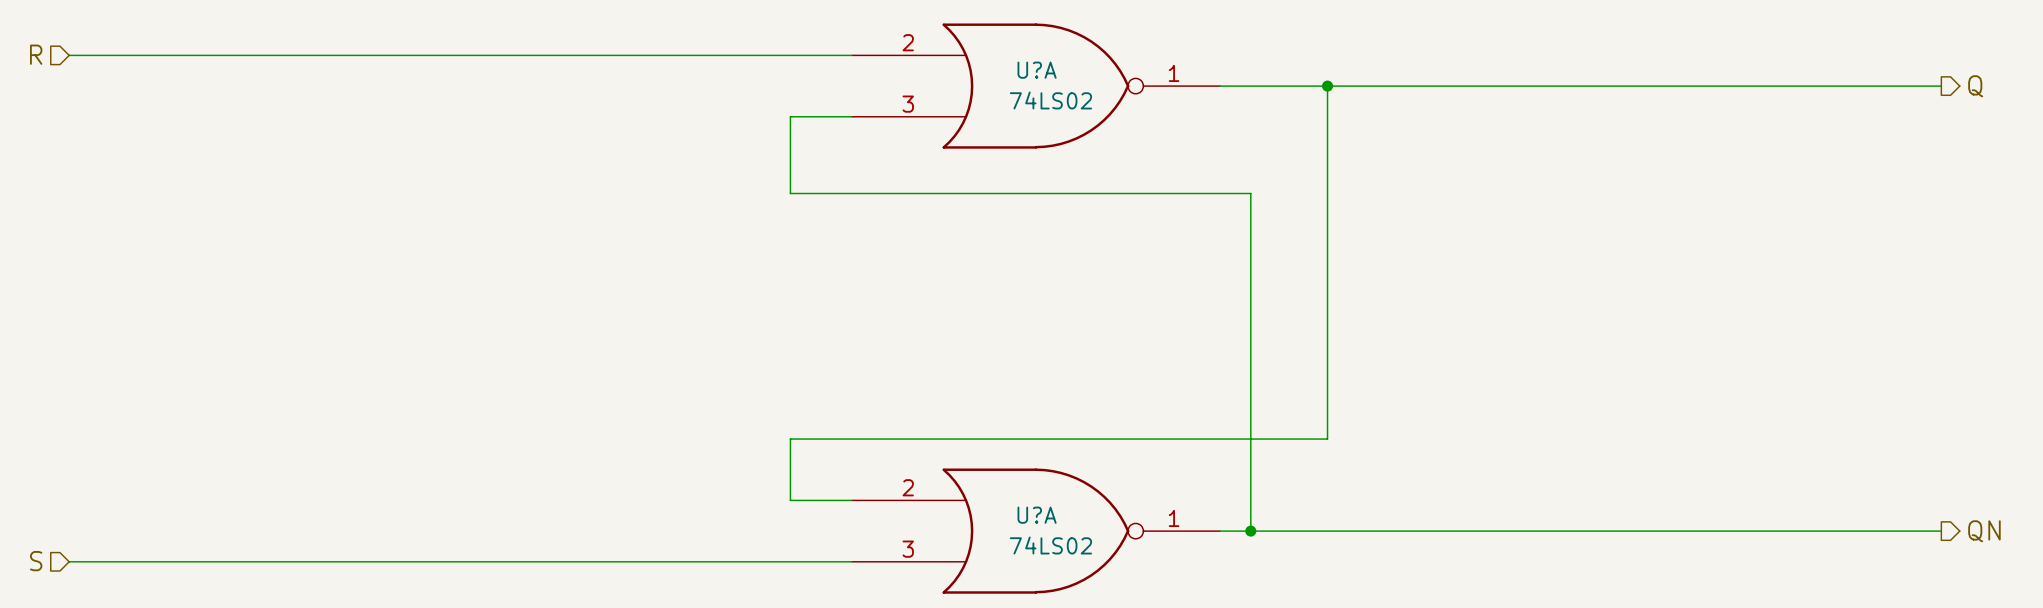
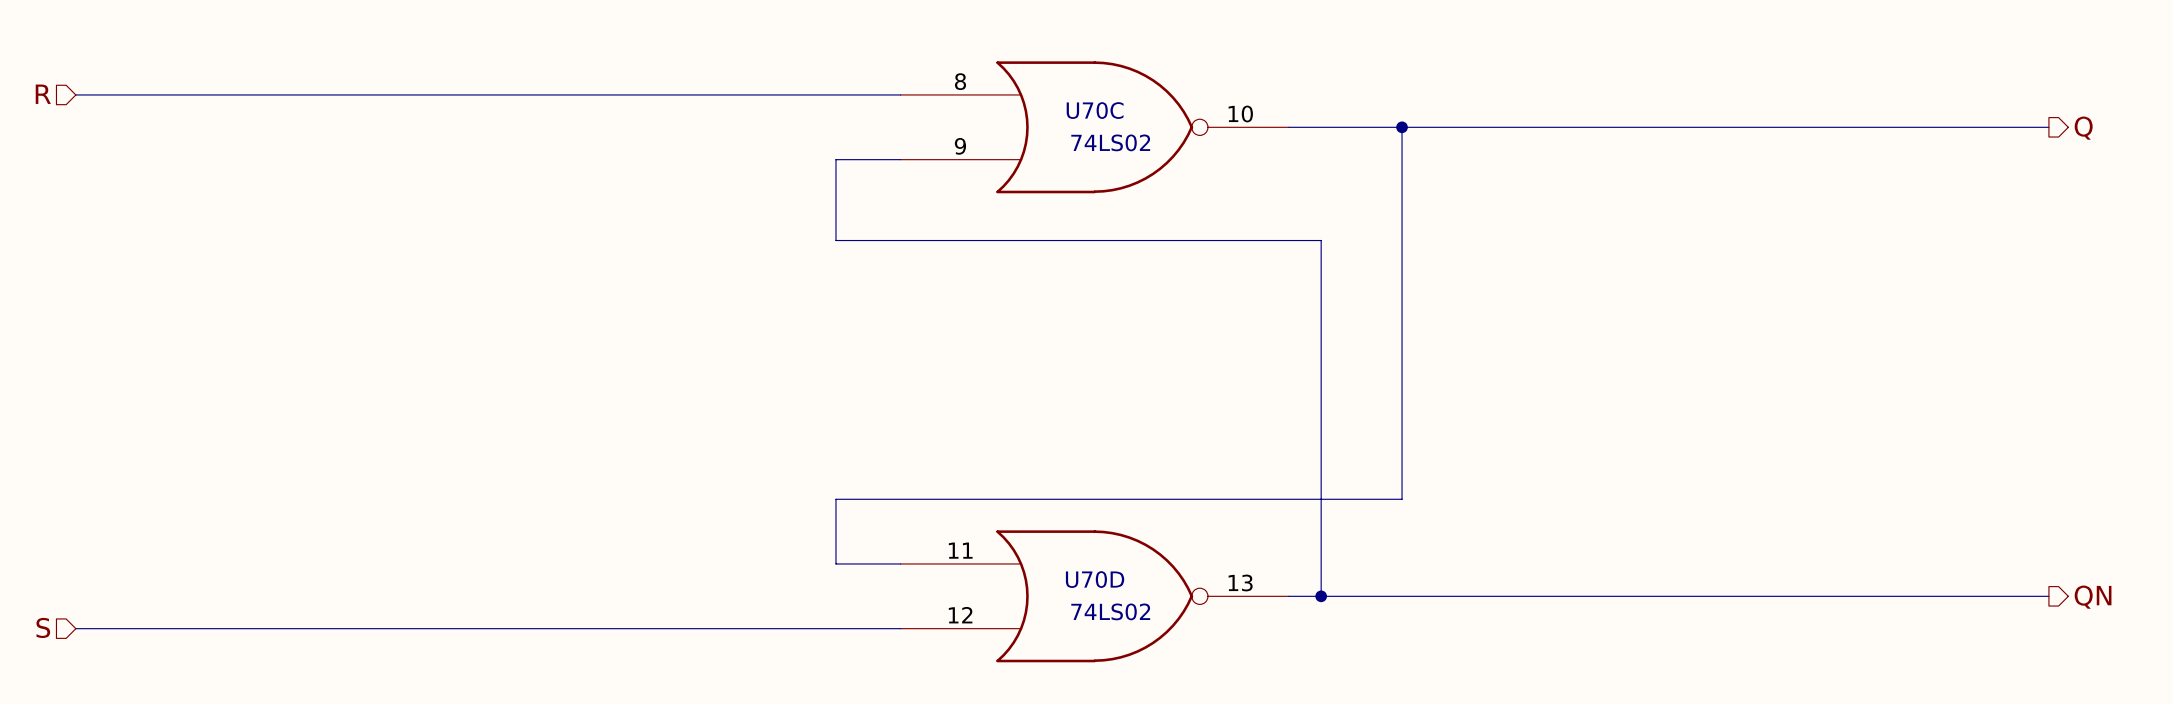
U?A pin number: 2 (908, 42) -> 8 (960, 81)
U?A name: U?A (1037, 70) -> U70C (1095, 110)
U?A pin number: 1 (1174, 73) -> 10 (1240, 113)
U?A pin number: 3 (908, 104) -> 9 (960, 146)
U?A pin number: 2 (908, 487) -> 11 (960, 550)
U?A name: U?A (1037, 515) -> U70D (1095, 579)
U?A pin number: 1 (1174, 518) -> 13 (1240, 582)
U?A pin number: 3 (908, 549) -> 12 (960, 615)

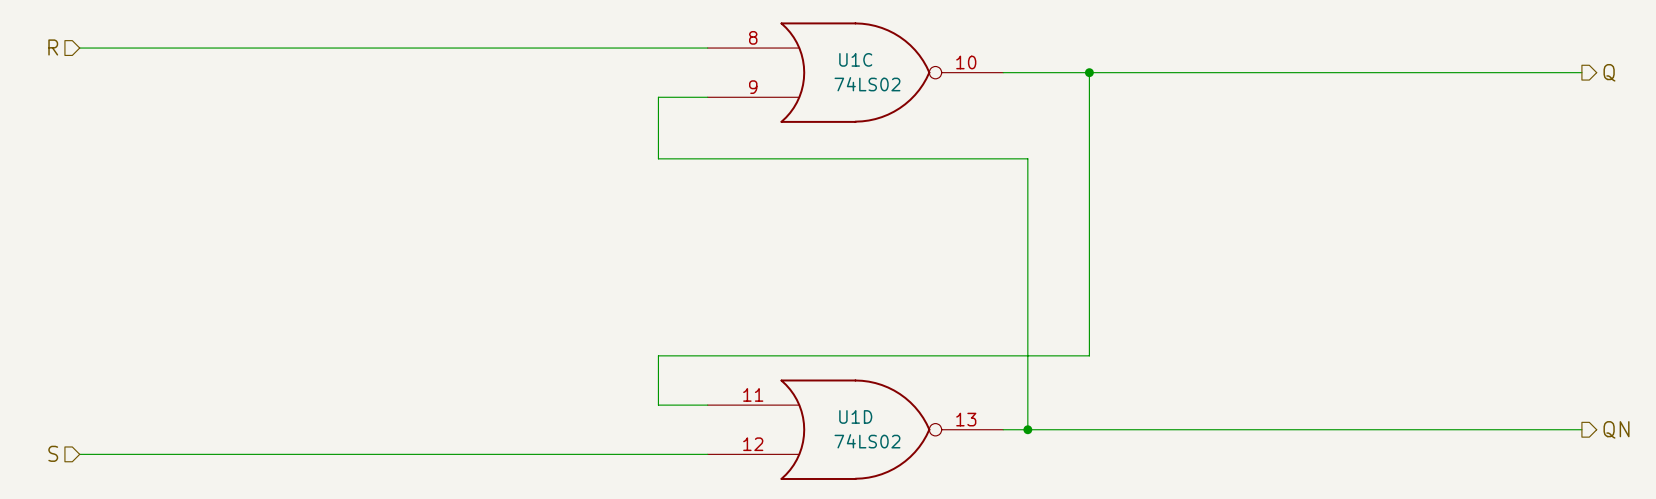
U70C name: U70C (1095, 110) -> U1C (855, 59)
U70D name: U70D (1095, 579) -> U1D (855, 416)

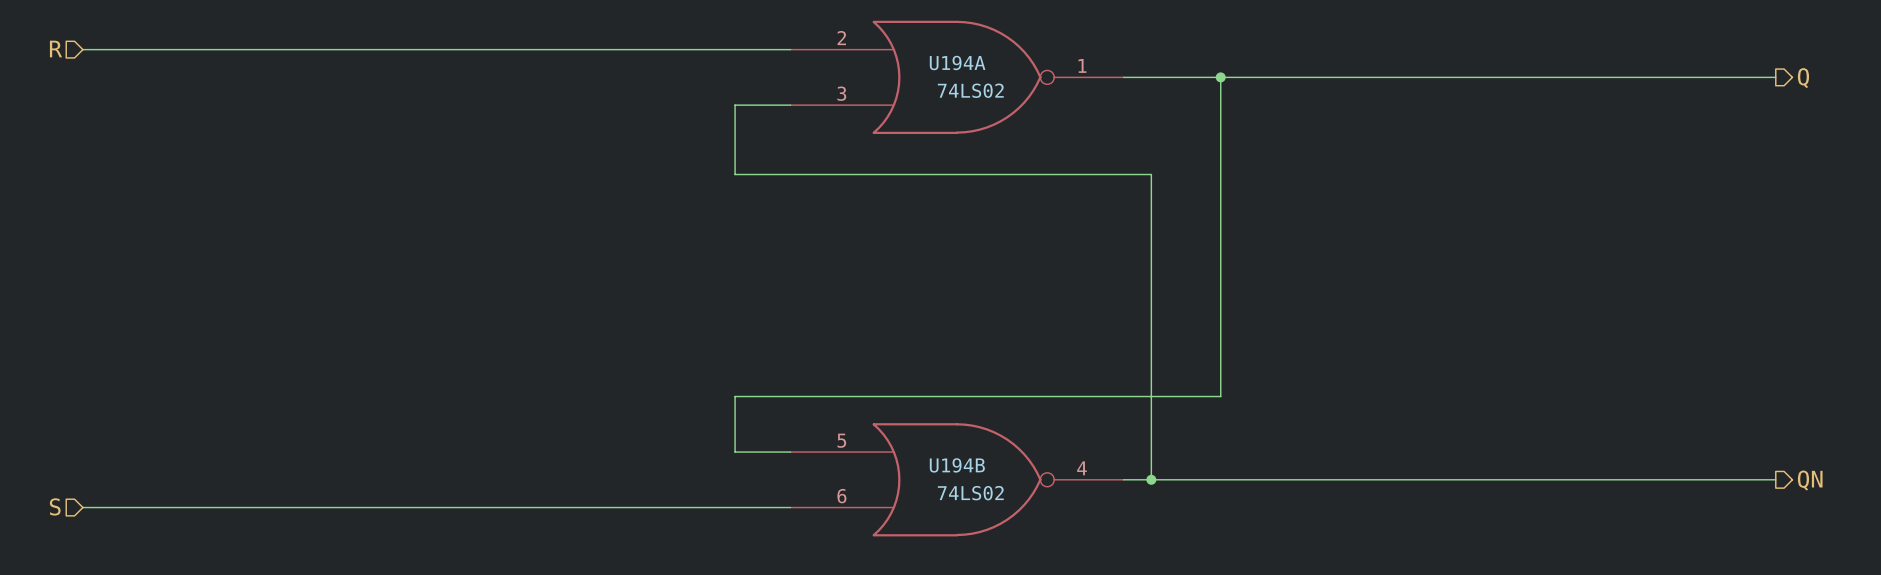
U1C pin number: 8 (753, 37) -> 2 (841, 38)
U1C name: U1C (855, 59) -> U194A (957, 62)
U1C pin number: 10 (966, 62) -> 1 (1082, 65)
U1C pin number: 9 (753, 87) -> 3 (841, 93)
U1D pin number: 11 (753, 394) -> 5 (841, 440)
U1D name: U1D (855, 416) -> U194B (957, 465)
U1D pin number: 13 (966, 419) -> 4 (1081, 468)
U1D pin number: 12 (753, 444) -> 6 (841, 496)

